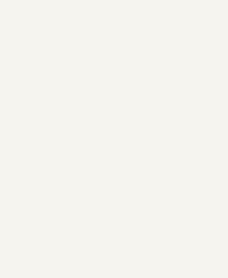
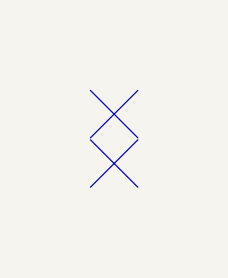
no-connect mark: none -> (114, 114)
no-connect mark: none -> (114, 163)

